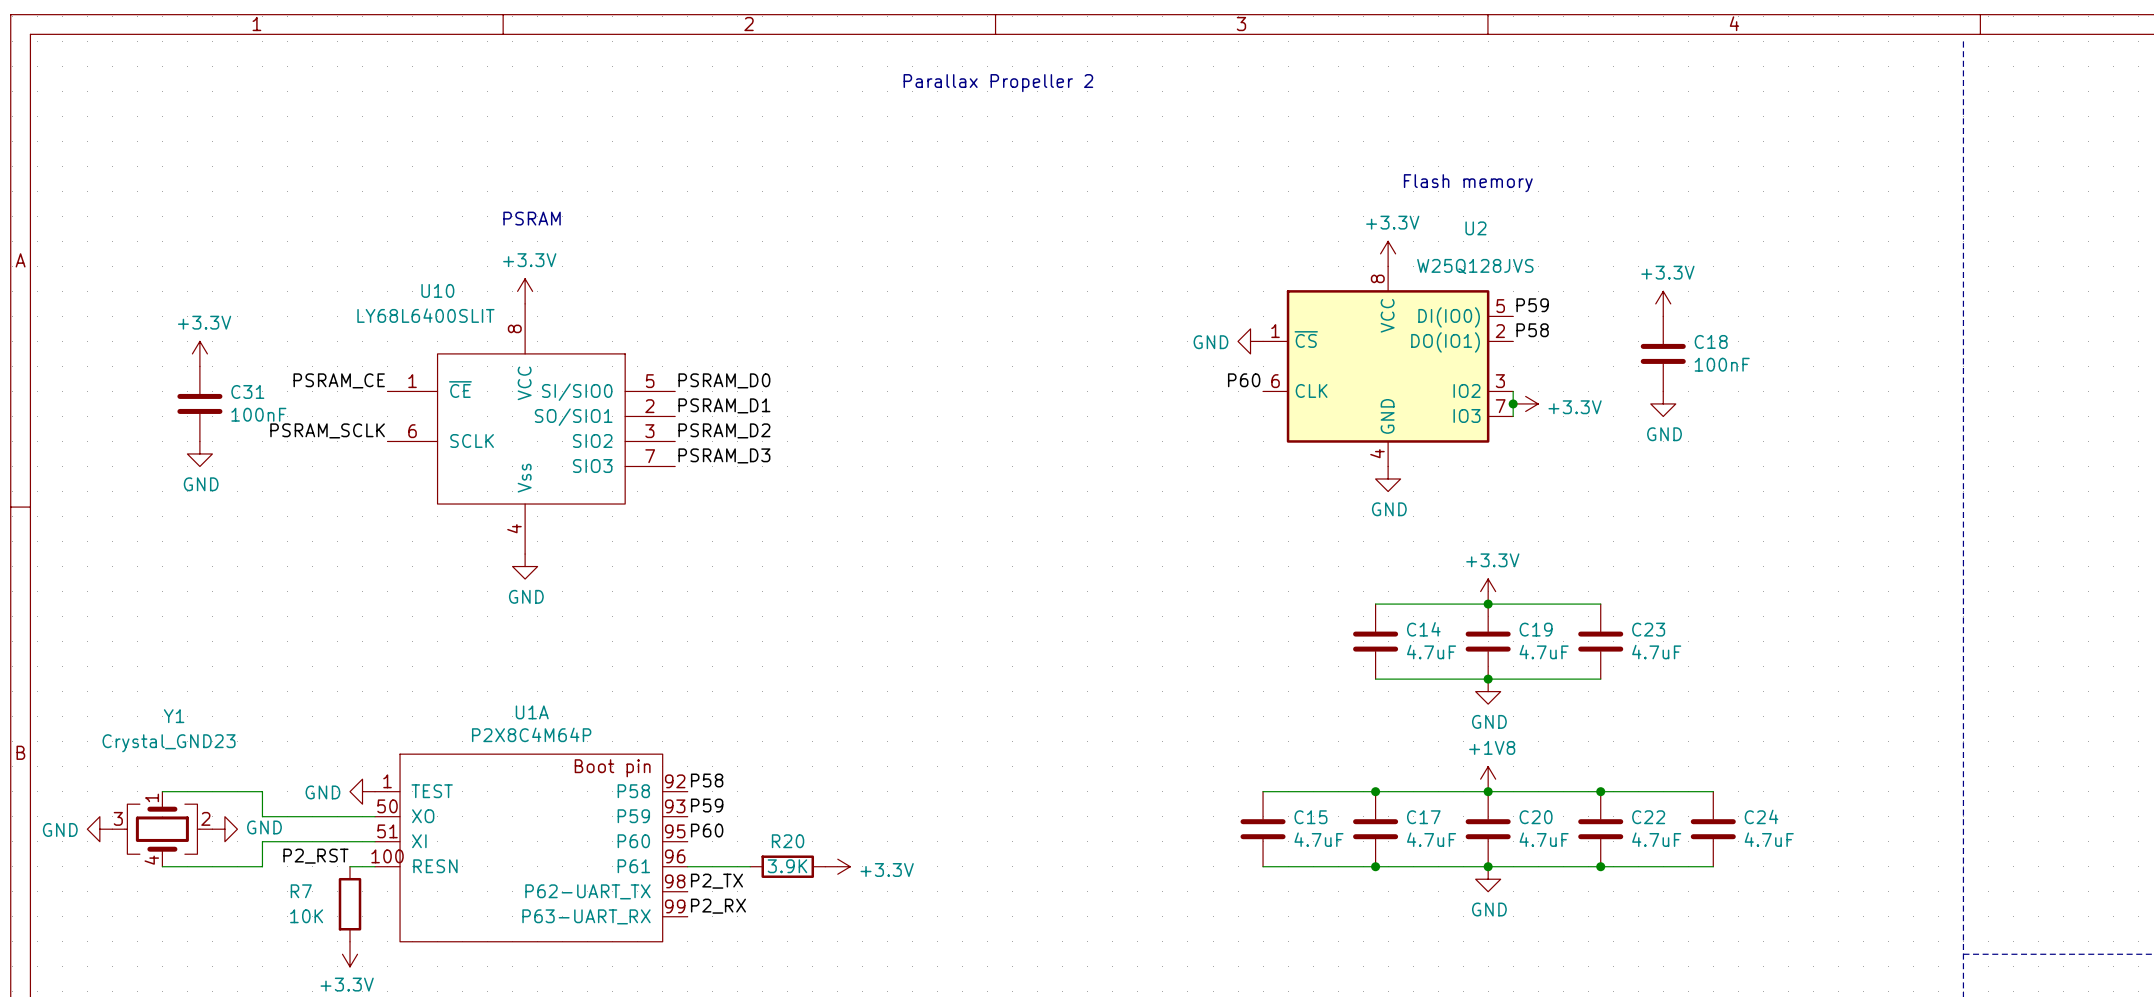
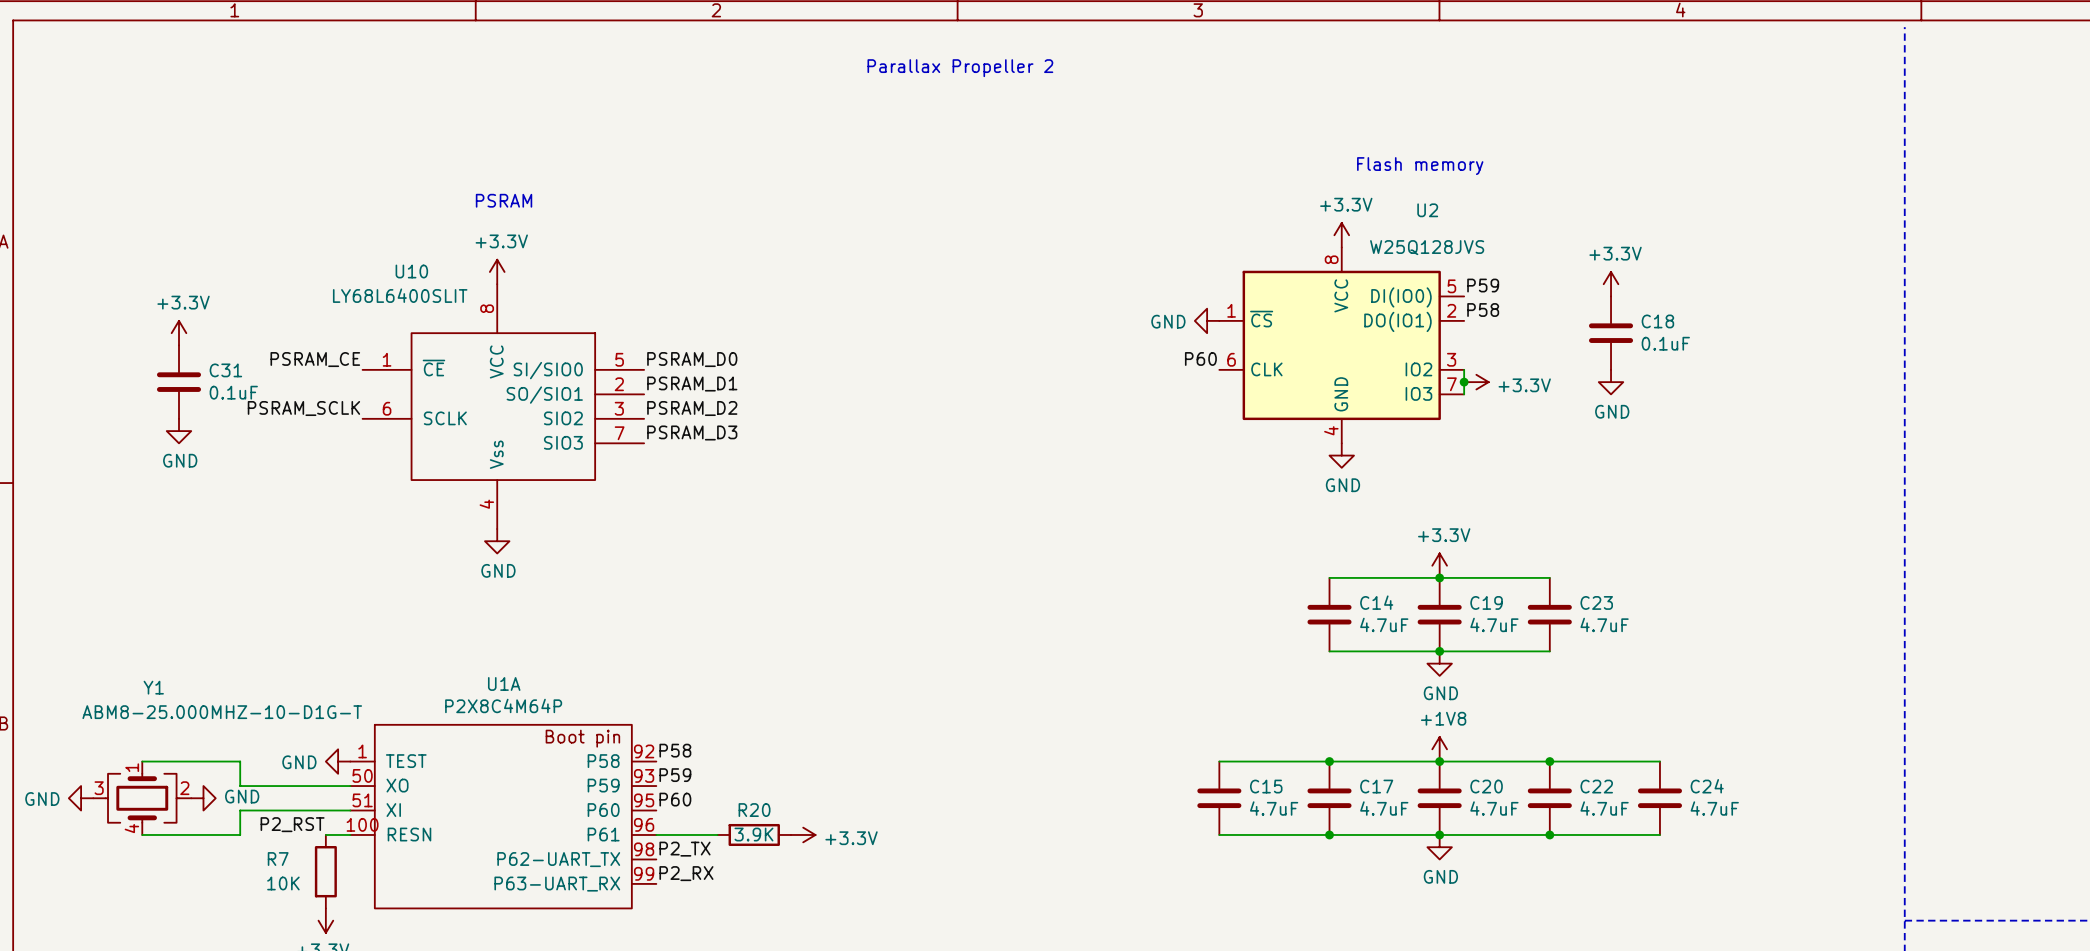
C18 value: 100nF (1722, 364) -> 0.1uF (1665, 343)
C31 value: 100nF (258, 414) -> 0.1uF (233, 392)
Y1 value: Crystal_GND23 (169, 743) -> ABM8-25.000MHZ-10-D1G-T (222, 712)

